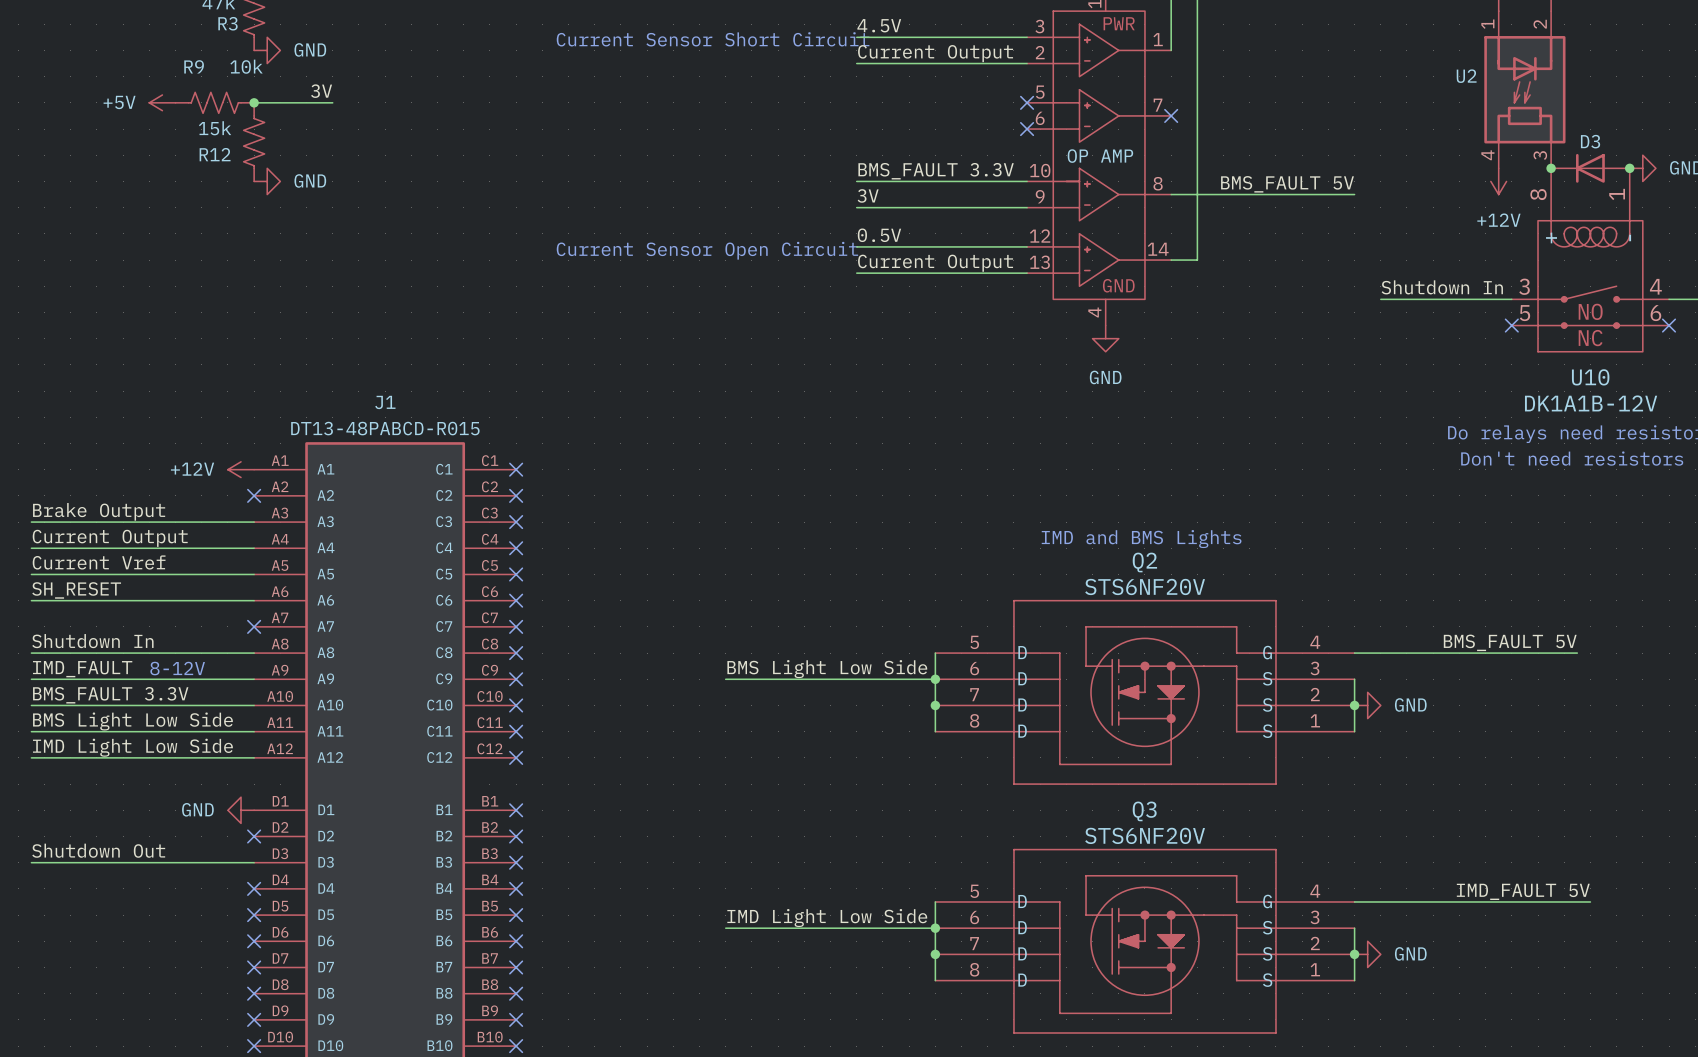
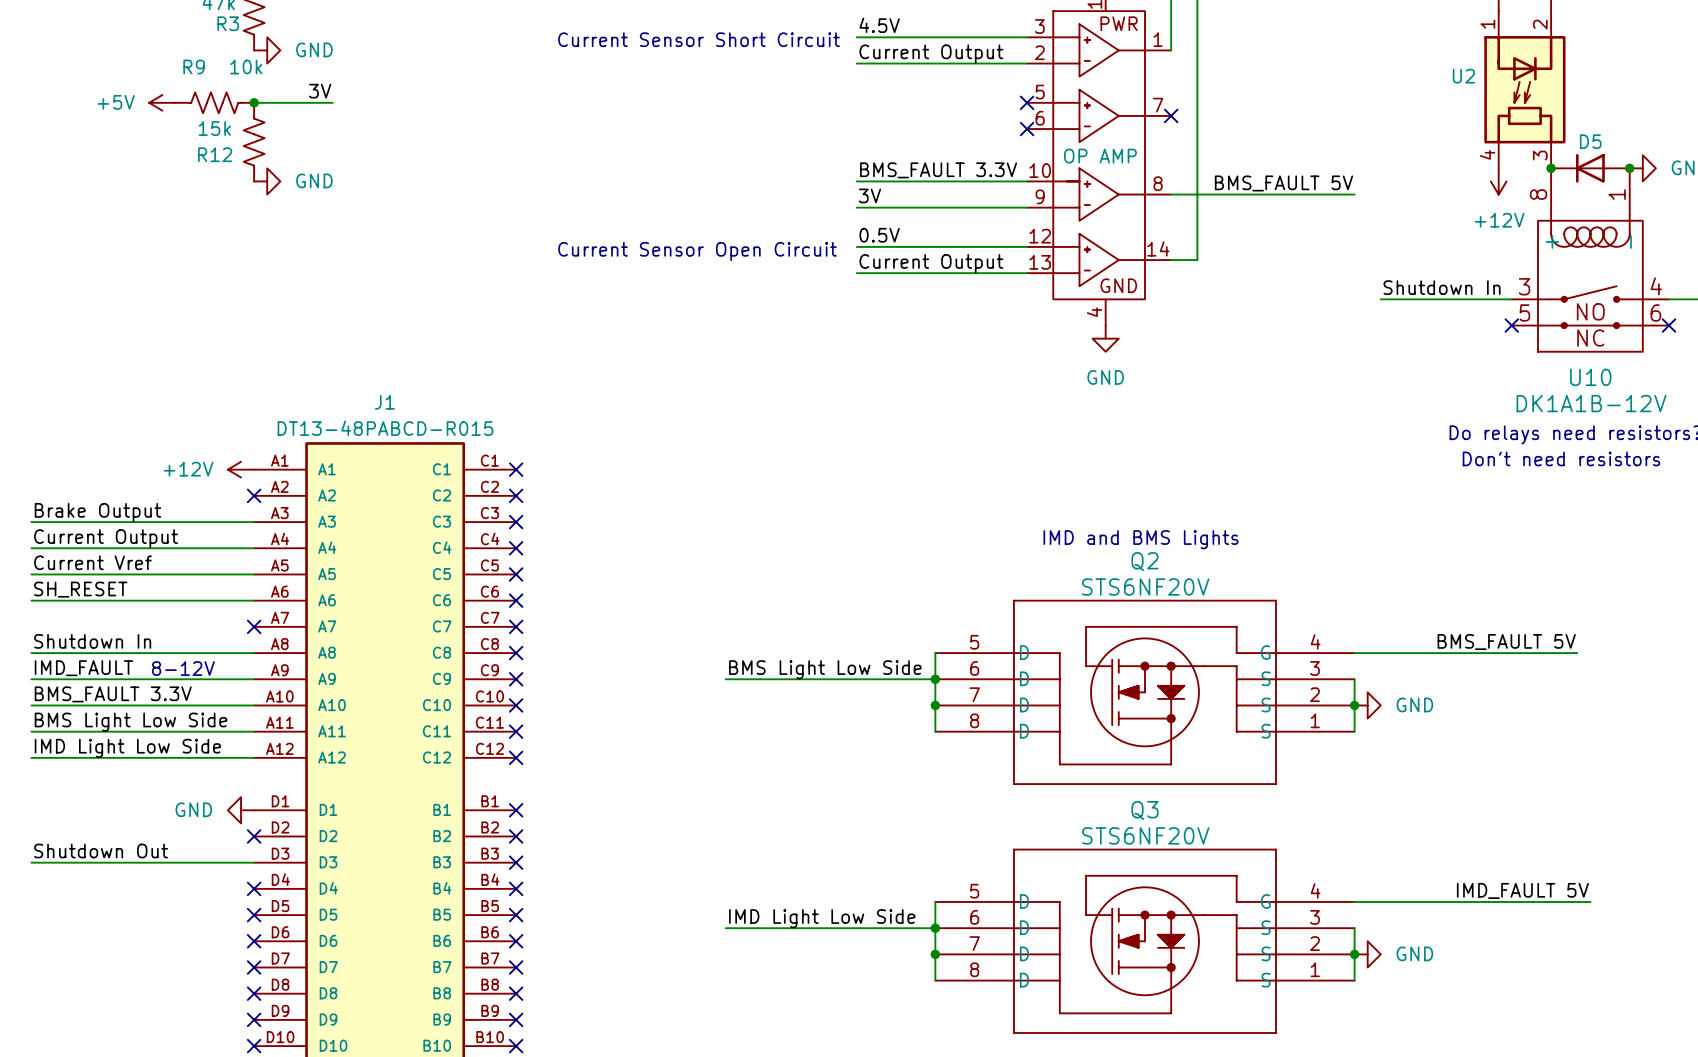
D3 name: D3 (1590, 141) -> D5 (1590, 141)

